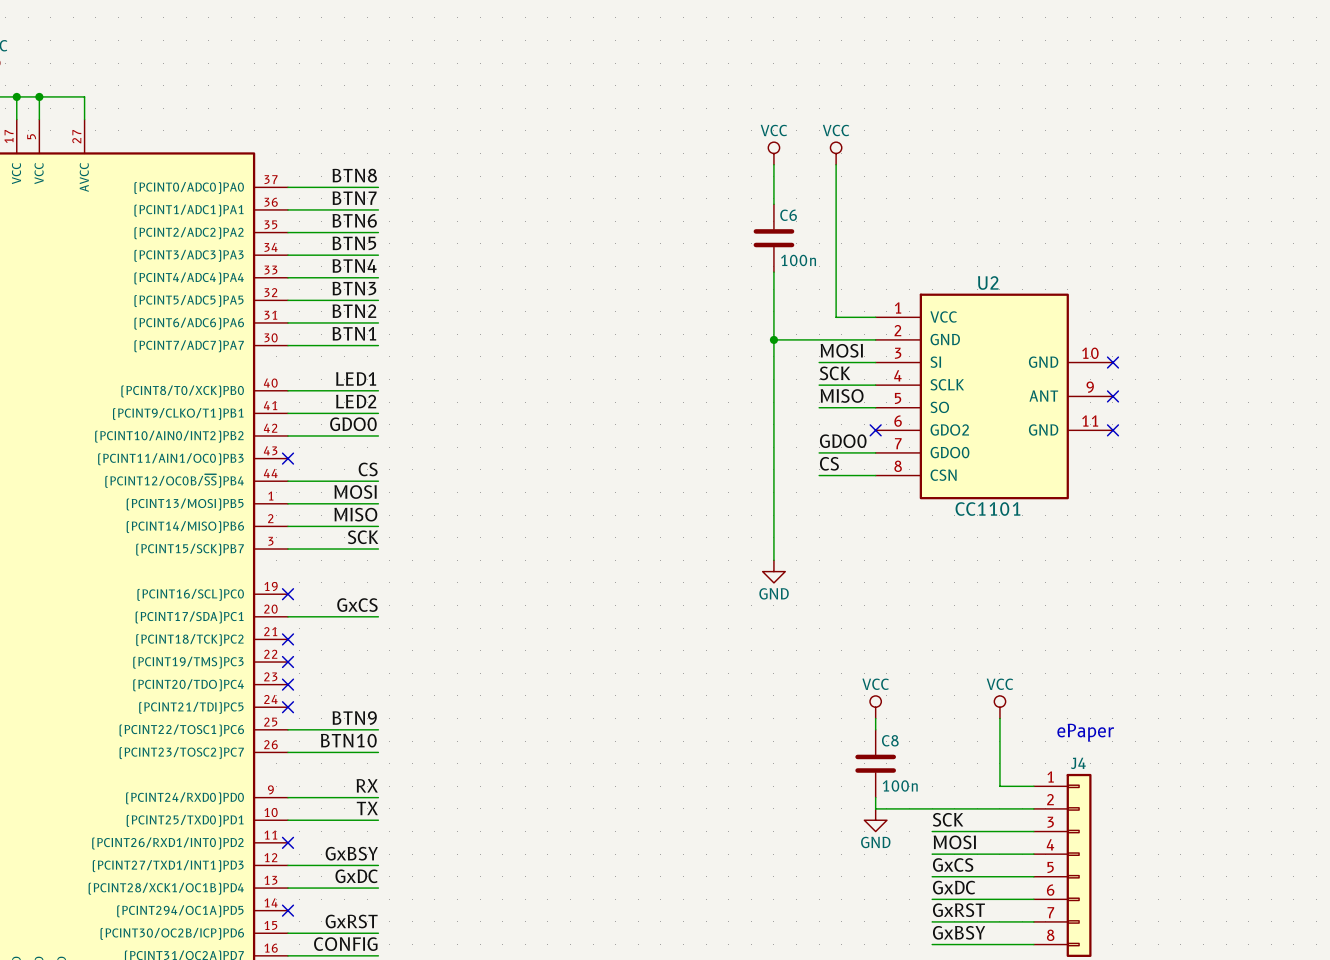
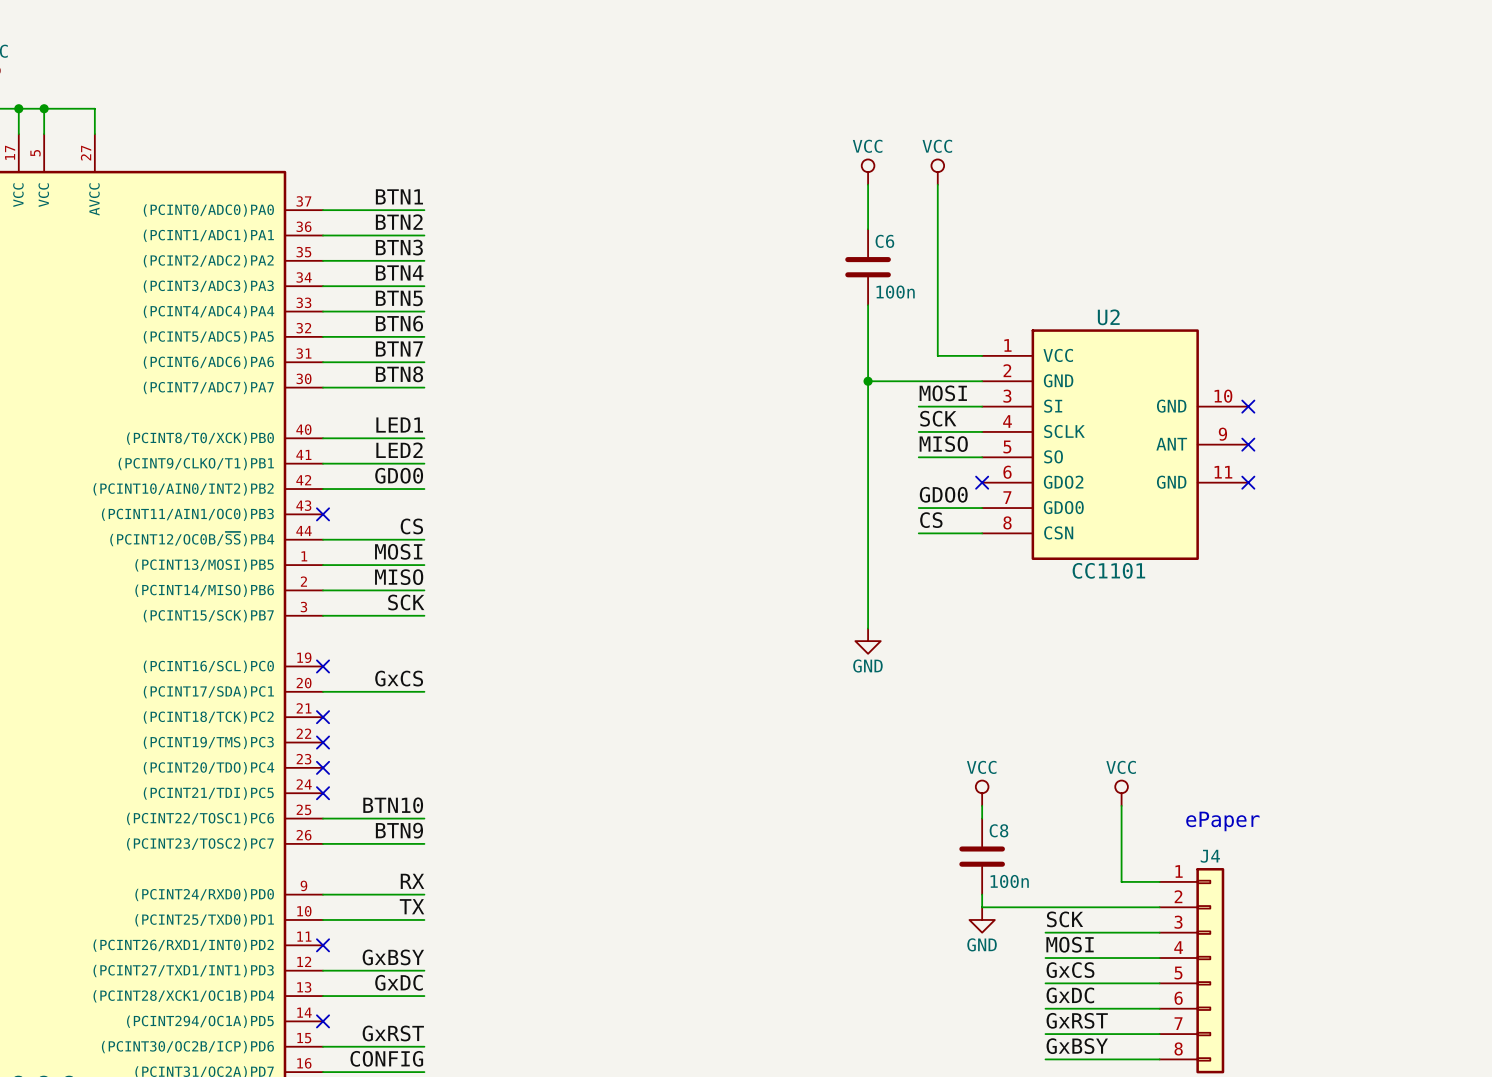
label: BTN8 (354, 175) -> BTN1 (399, 196)
label: BTN7 (354, 198) -> BTN2 (399, 222)
label: BTN6 (354, 220) -> BTN3 (399, 247)
label: BTN5 (354, 243) -> BTN4 (399, 272)
label: BTN4 (354, 265) -> BTN5 (399, 298)
label: BTN3 (354, 288) -> BTN6 (399, 323)
label: BTN2 (354, 311) -> BTN7 (399, 348)
label: BTN1 (354, 333) -> BTN8 (399, 374)
label: BTN9 (354, 718) -> BTN10 (393, 805)
label: BTN10 (348, 740) -> BTN9 (399, 830)

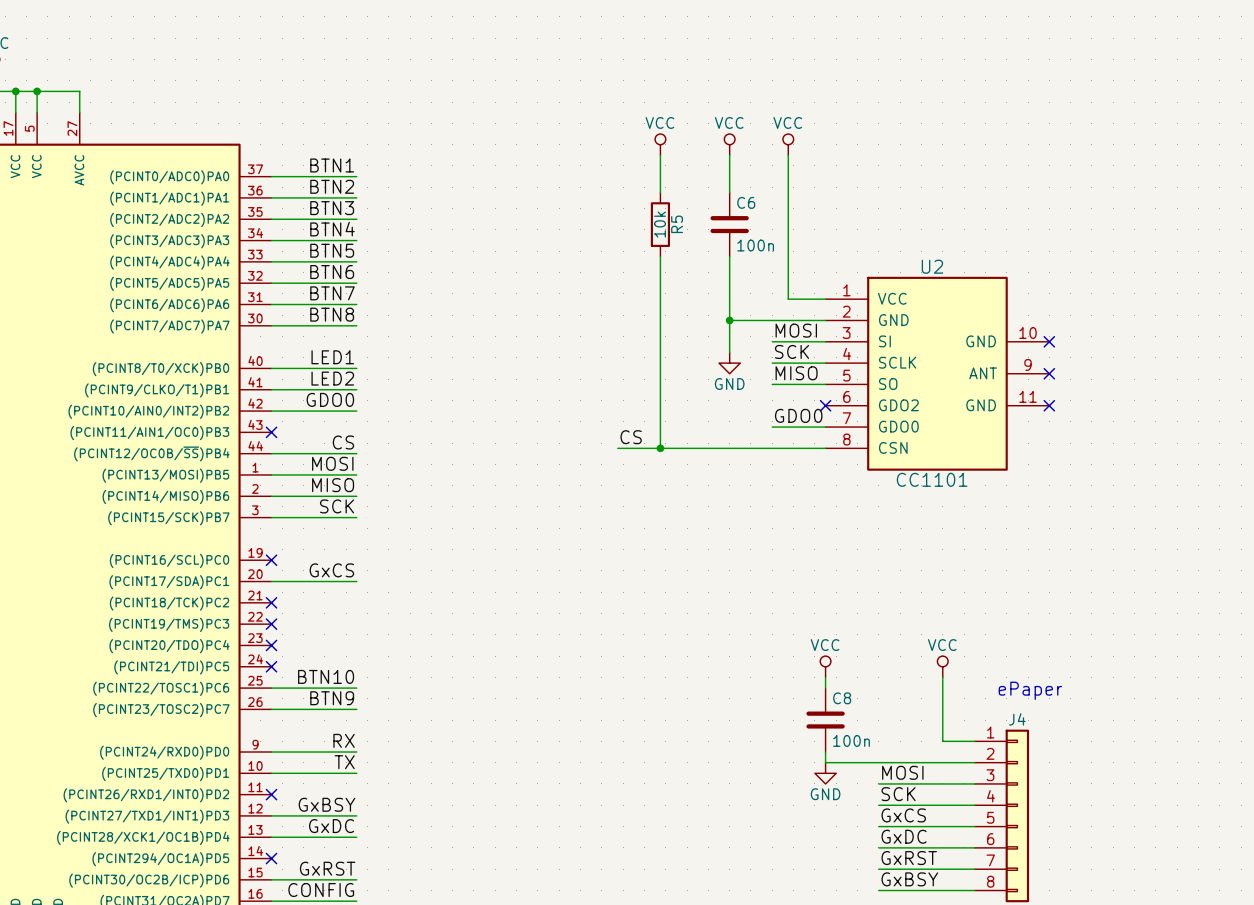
power symbol: none -> VCC (660, 144)
wire: none -> (660, 155) (660, 192)
R5: none -> 10k (660, 224)
wire: none -> (660, 256) (660, 448)
wire: (868, 419) (868, 628) -> none
label position: CS (931, 520) -> CS (631, 437)
wire: none -> (617, 448) (772, 448)
junction: none -> (660, 448)
power symbol position: GND (868, 641) -> GND (729, 363)
label: SCK (1065, 919) -> MOSI (902, 772)
label: MOSI (1070, 944) -> SCK (898, 794)

